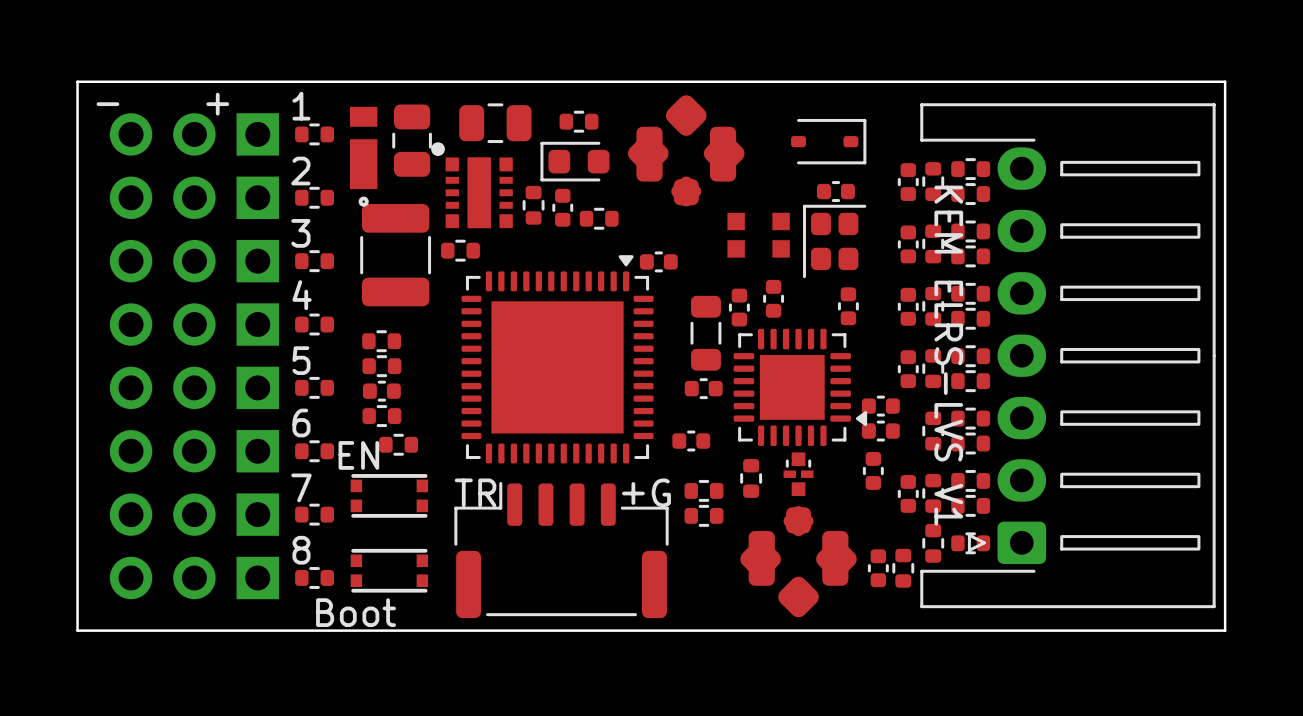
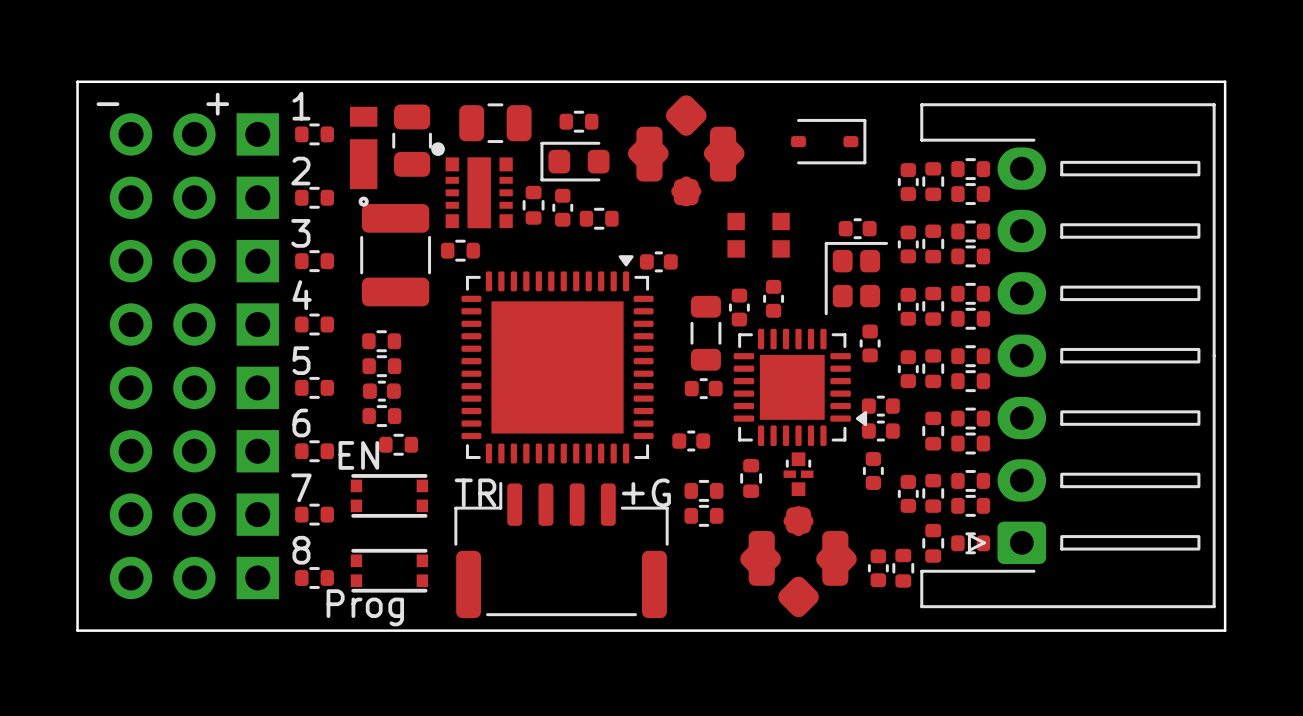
part: (835, 191) -> none
part: none -> (857, 228)
part position: (834, 241) -> (856, 278)
part: (848, 306) -> none
part: none -> (870, 343)
text: KEM ELRS-LVS V1 (948, 355) -> none
text: Boot (356, 612) -> Prog (365, 607)

